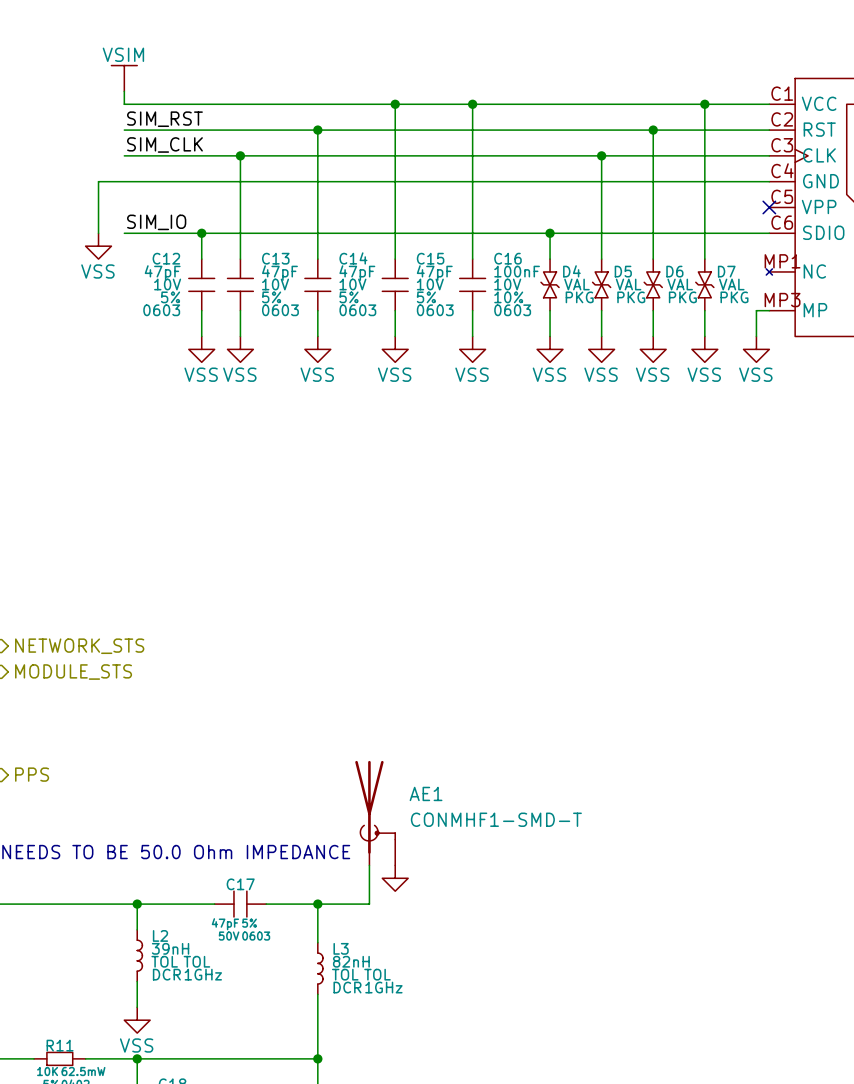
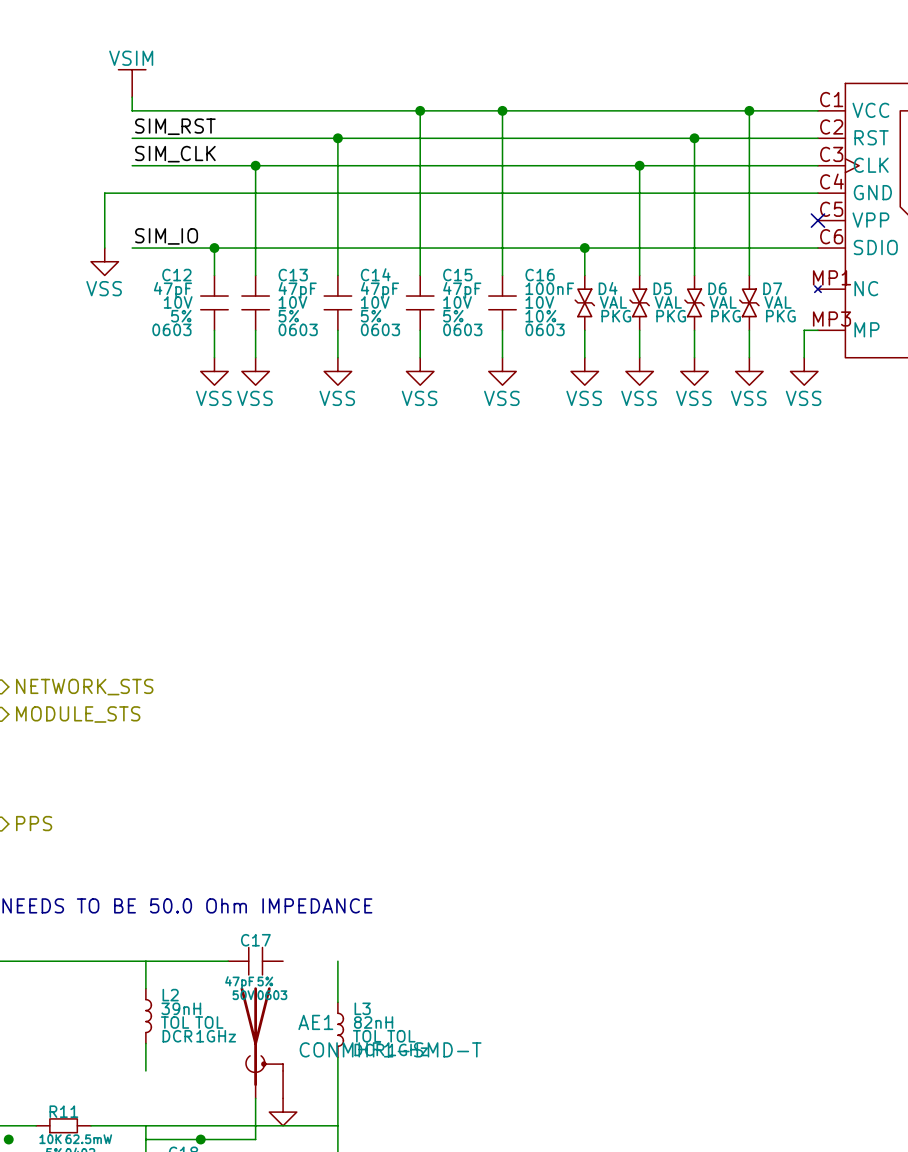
AE1 position: (375, 813) -> (261, 1042)
wire: (369, 865) (369, 904) (266, 904) -> (255, 1098) (255, 1139) (145, 1139)
power symbol position: (395, 878) -> (283, 1112)
junction: (137, 904) -> none
junction: (317, 904) -> none
power symbol: VSS (137, 1020) -> none
junction position: (137, 1058) -> (200, 1139)
junction: (317, 1058) -> none
junction: none -> (8, 1139)

